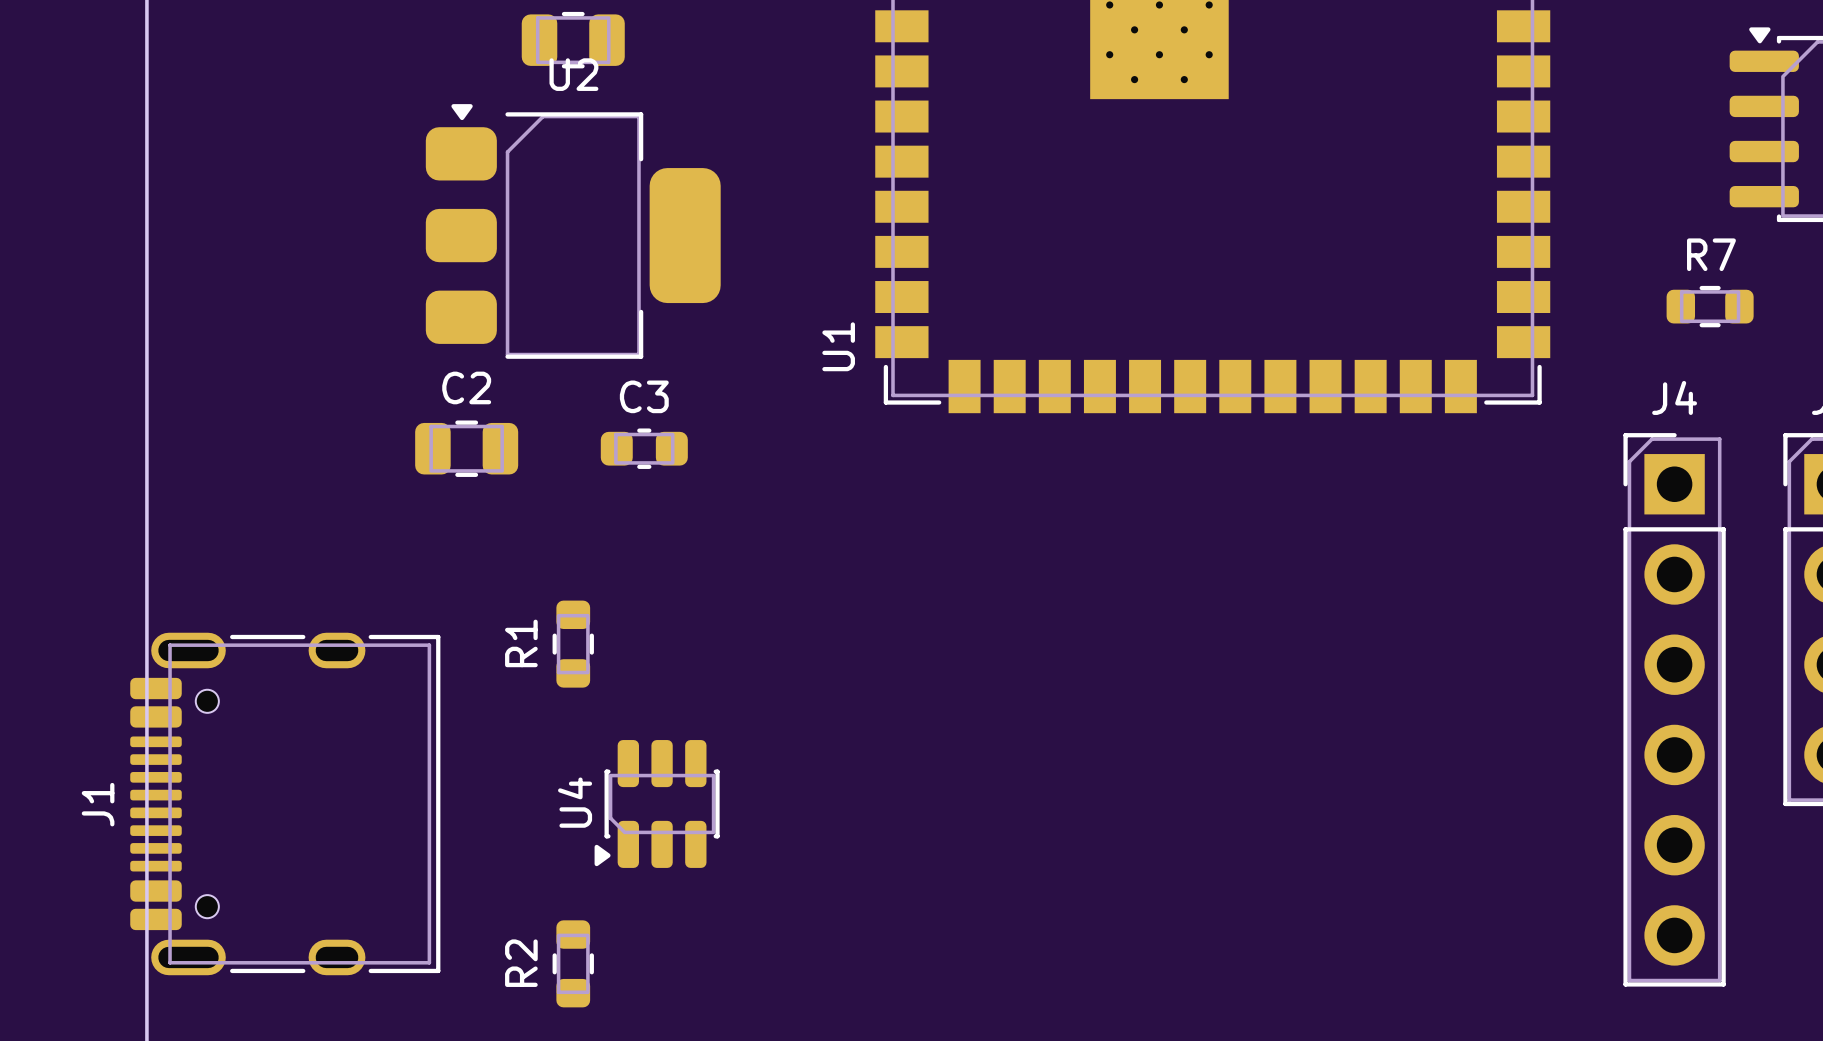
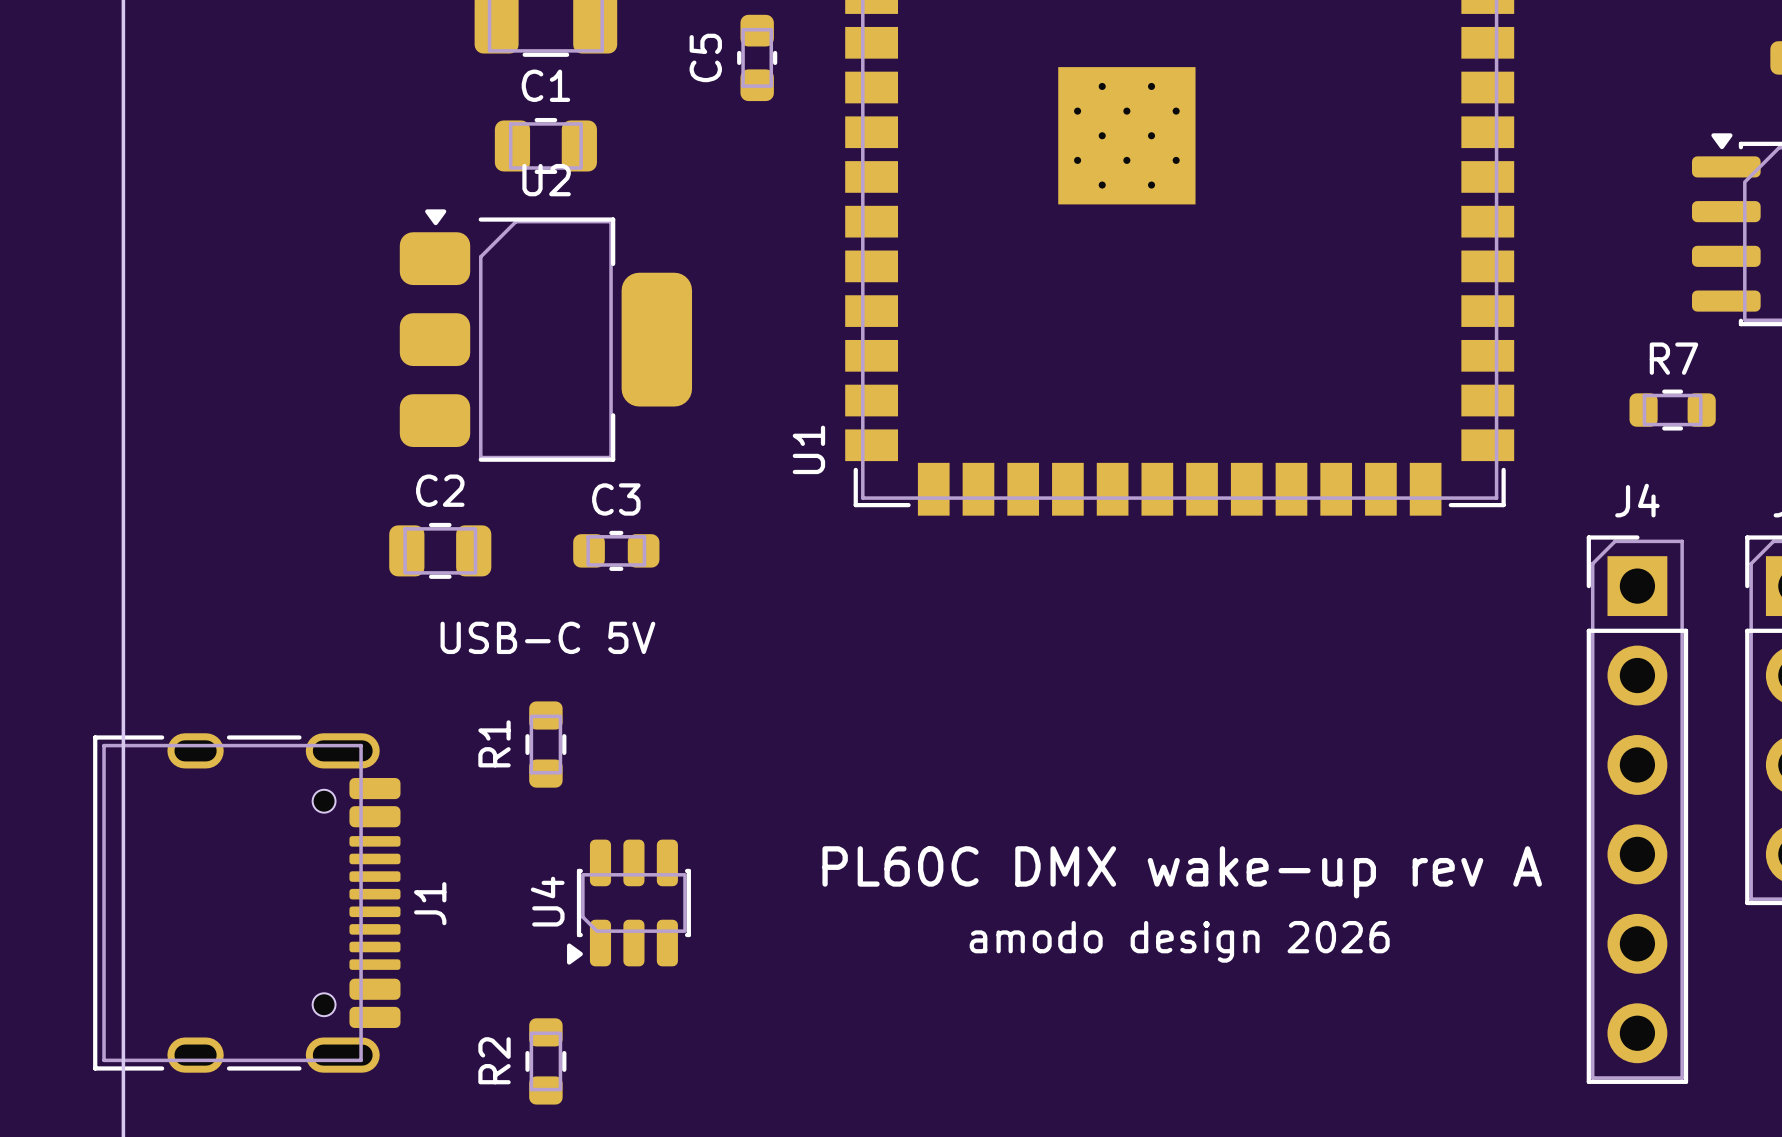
text: none -> USB-C 5V (547, 637)
text: none -> PL60C DMX wake-up rev A (1182, 872)
J1 rotation: 0° (285, 803) -> 180° (246, 902)
text: none -> amodo design 2026 (1179, 941)

